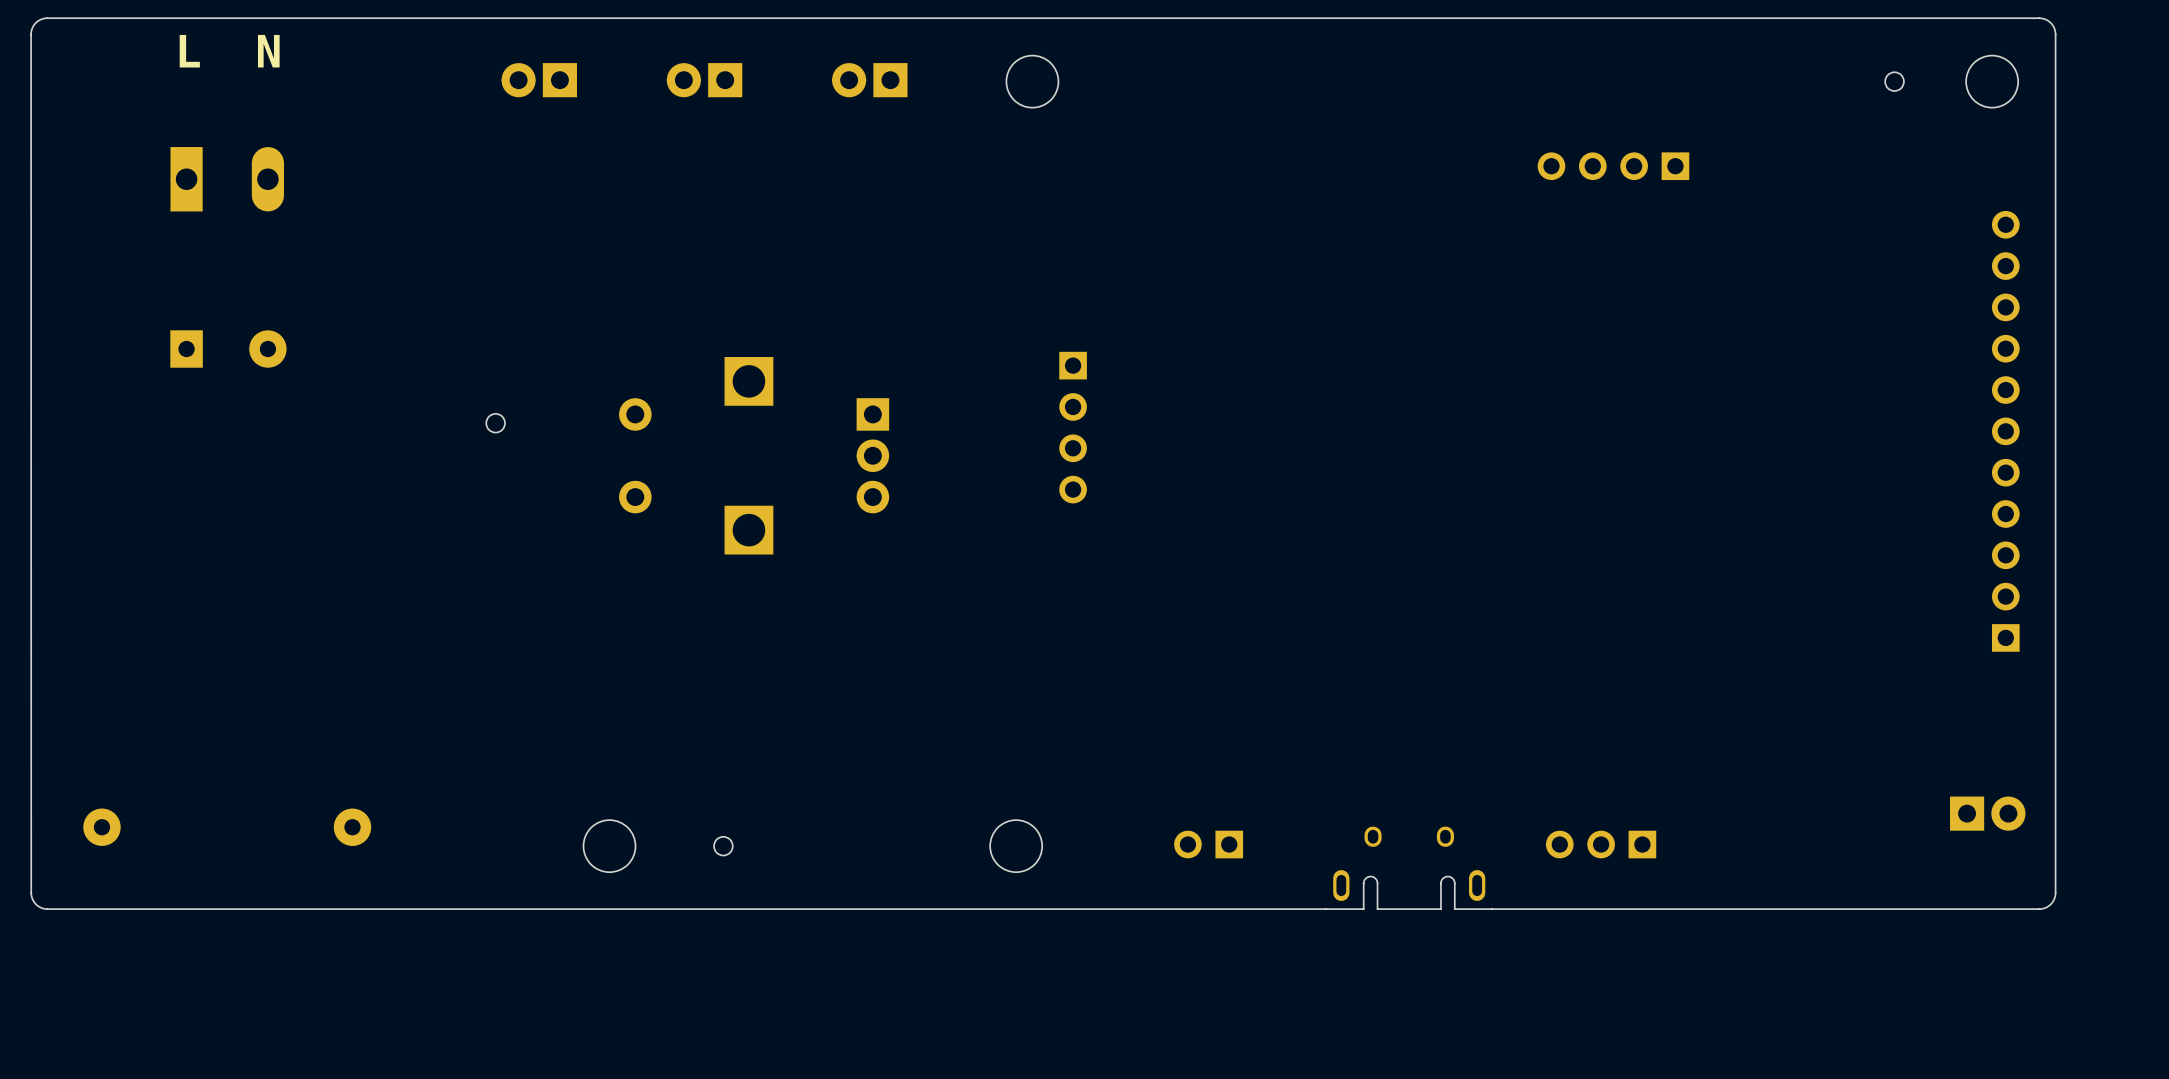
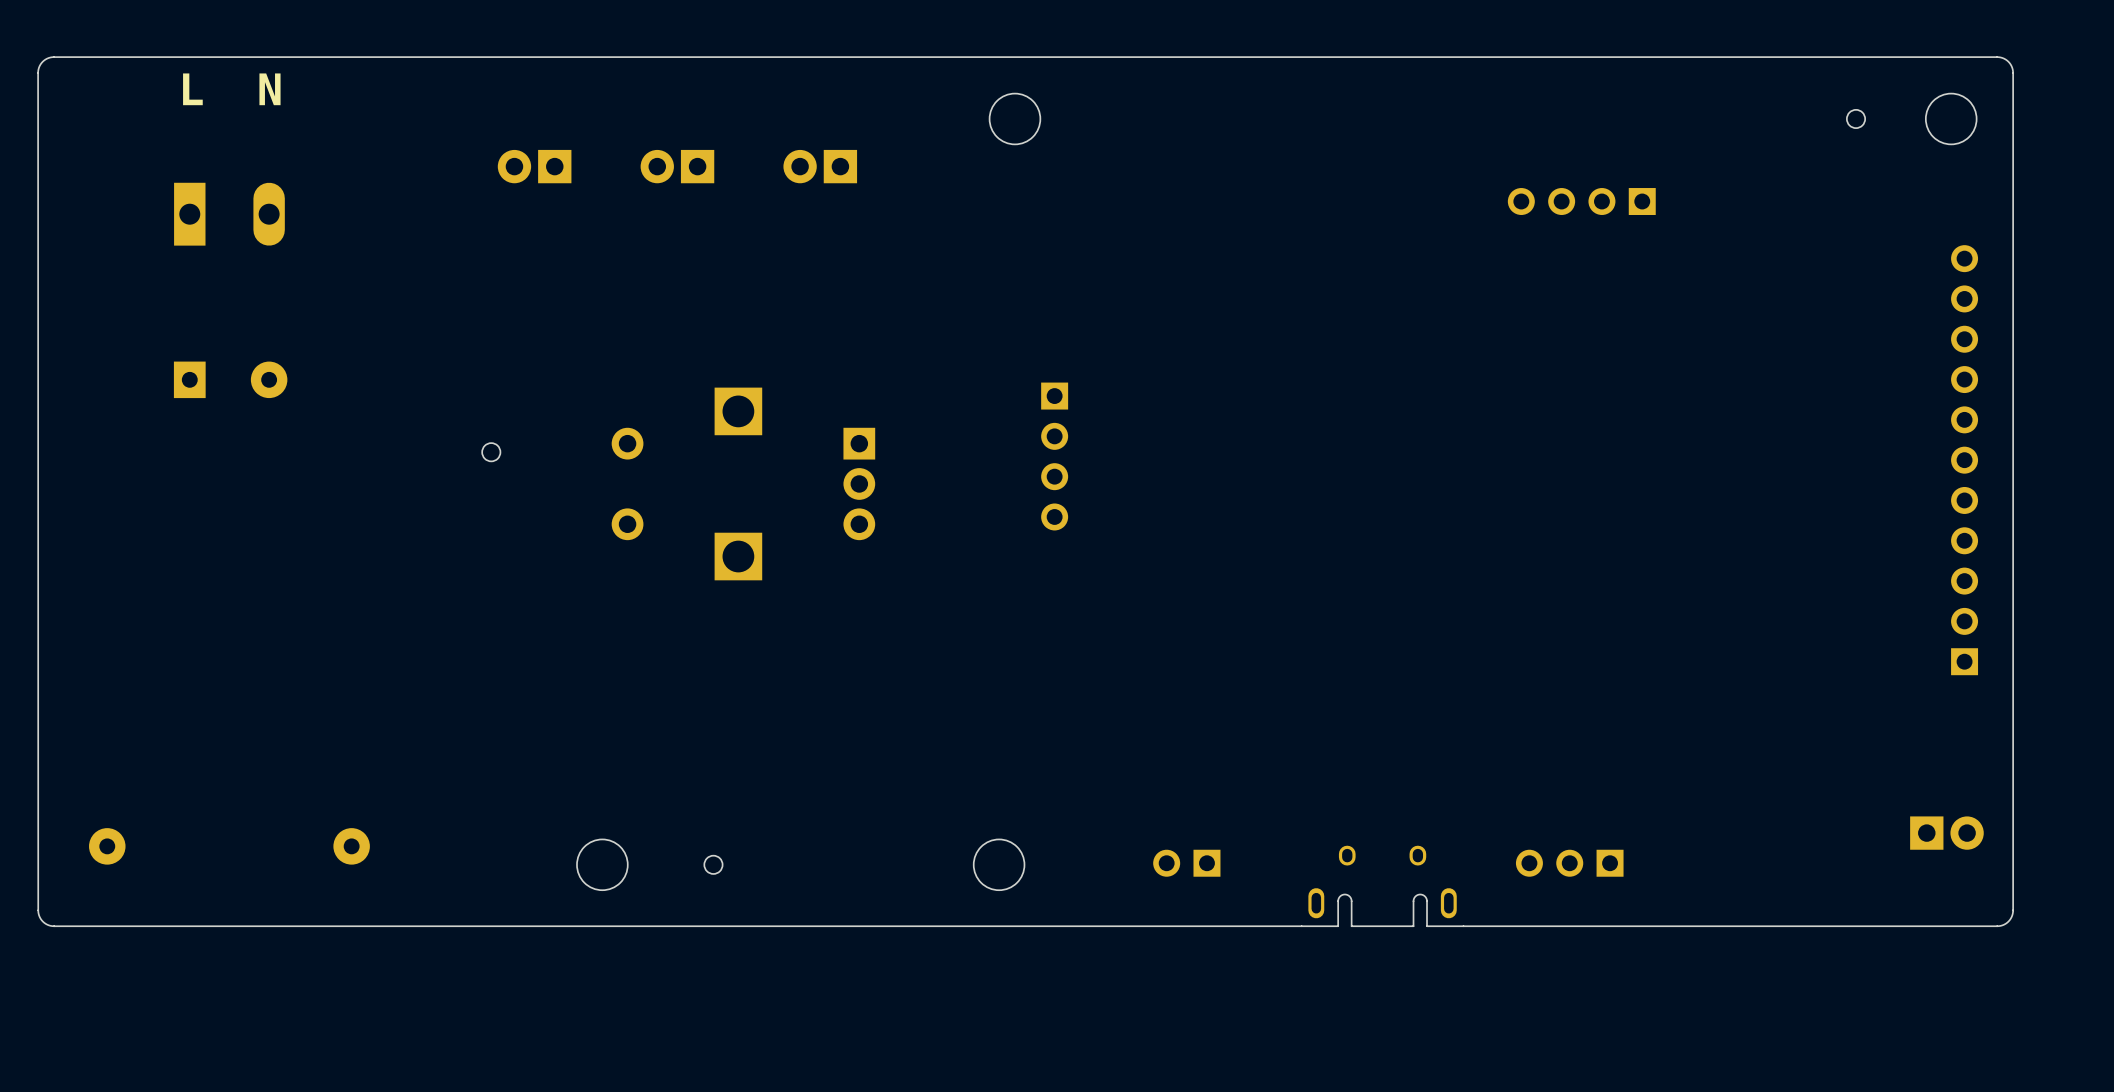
part position: (539, 80) -> (534, 166)
part position: (704, 80) -> (677, 166)
part position: (869, 80) -> (820, 166)

